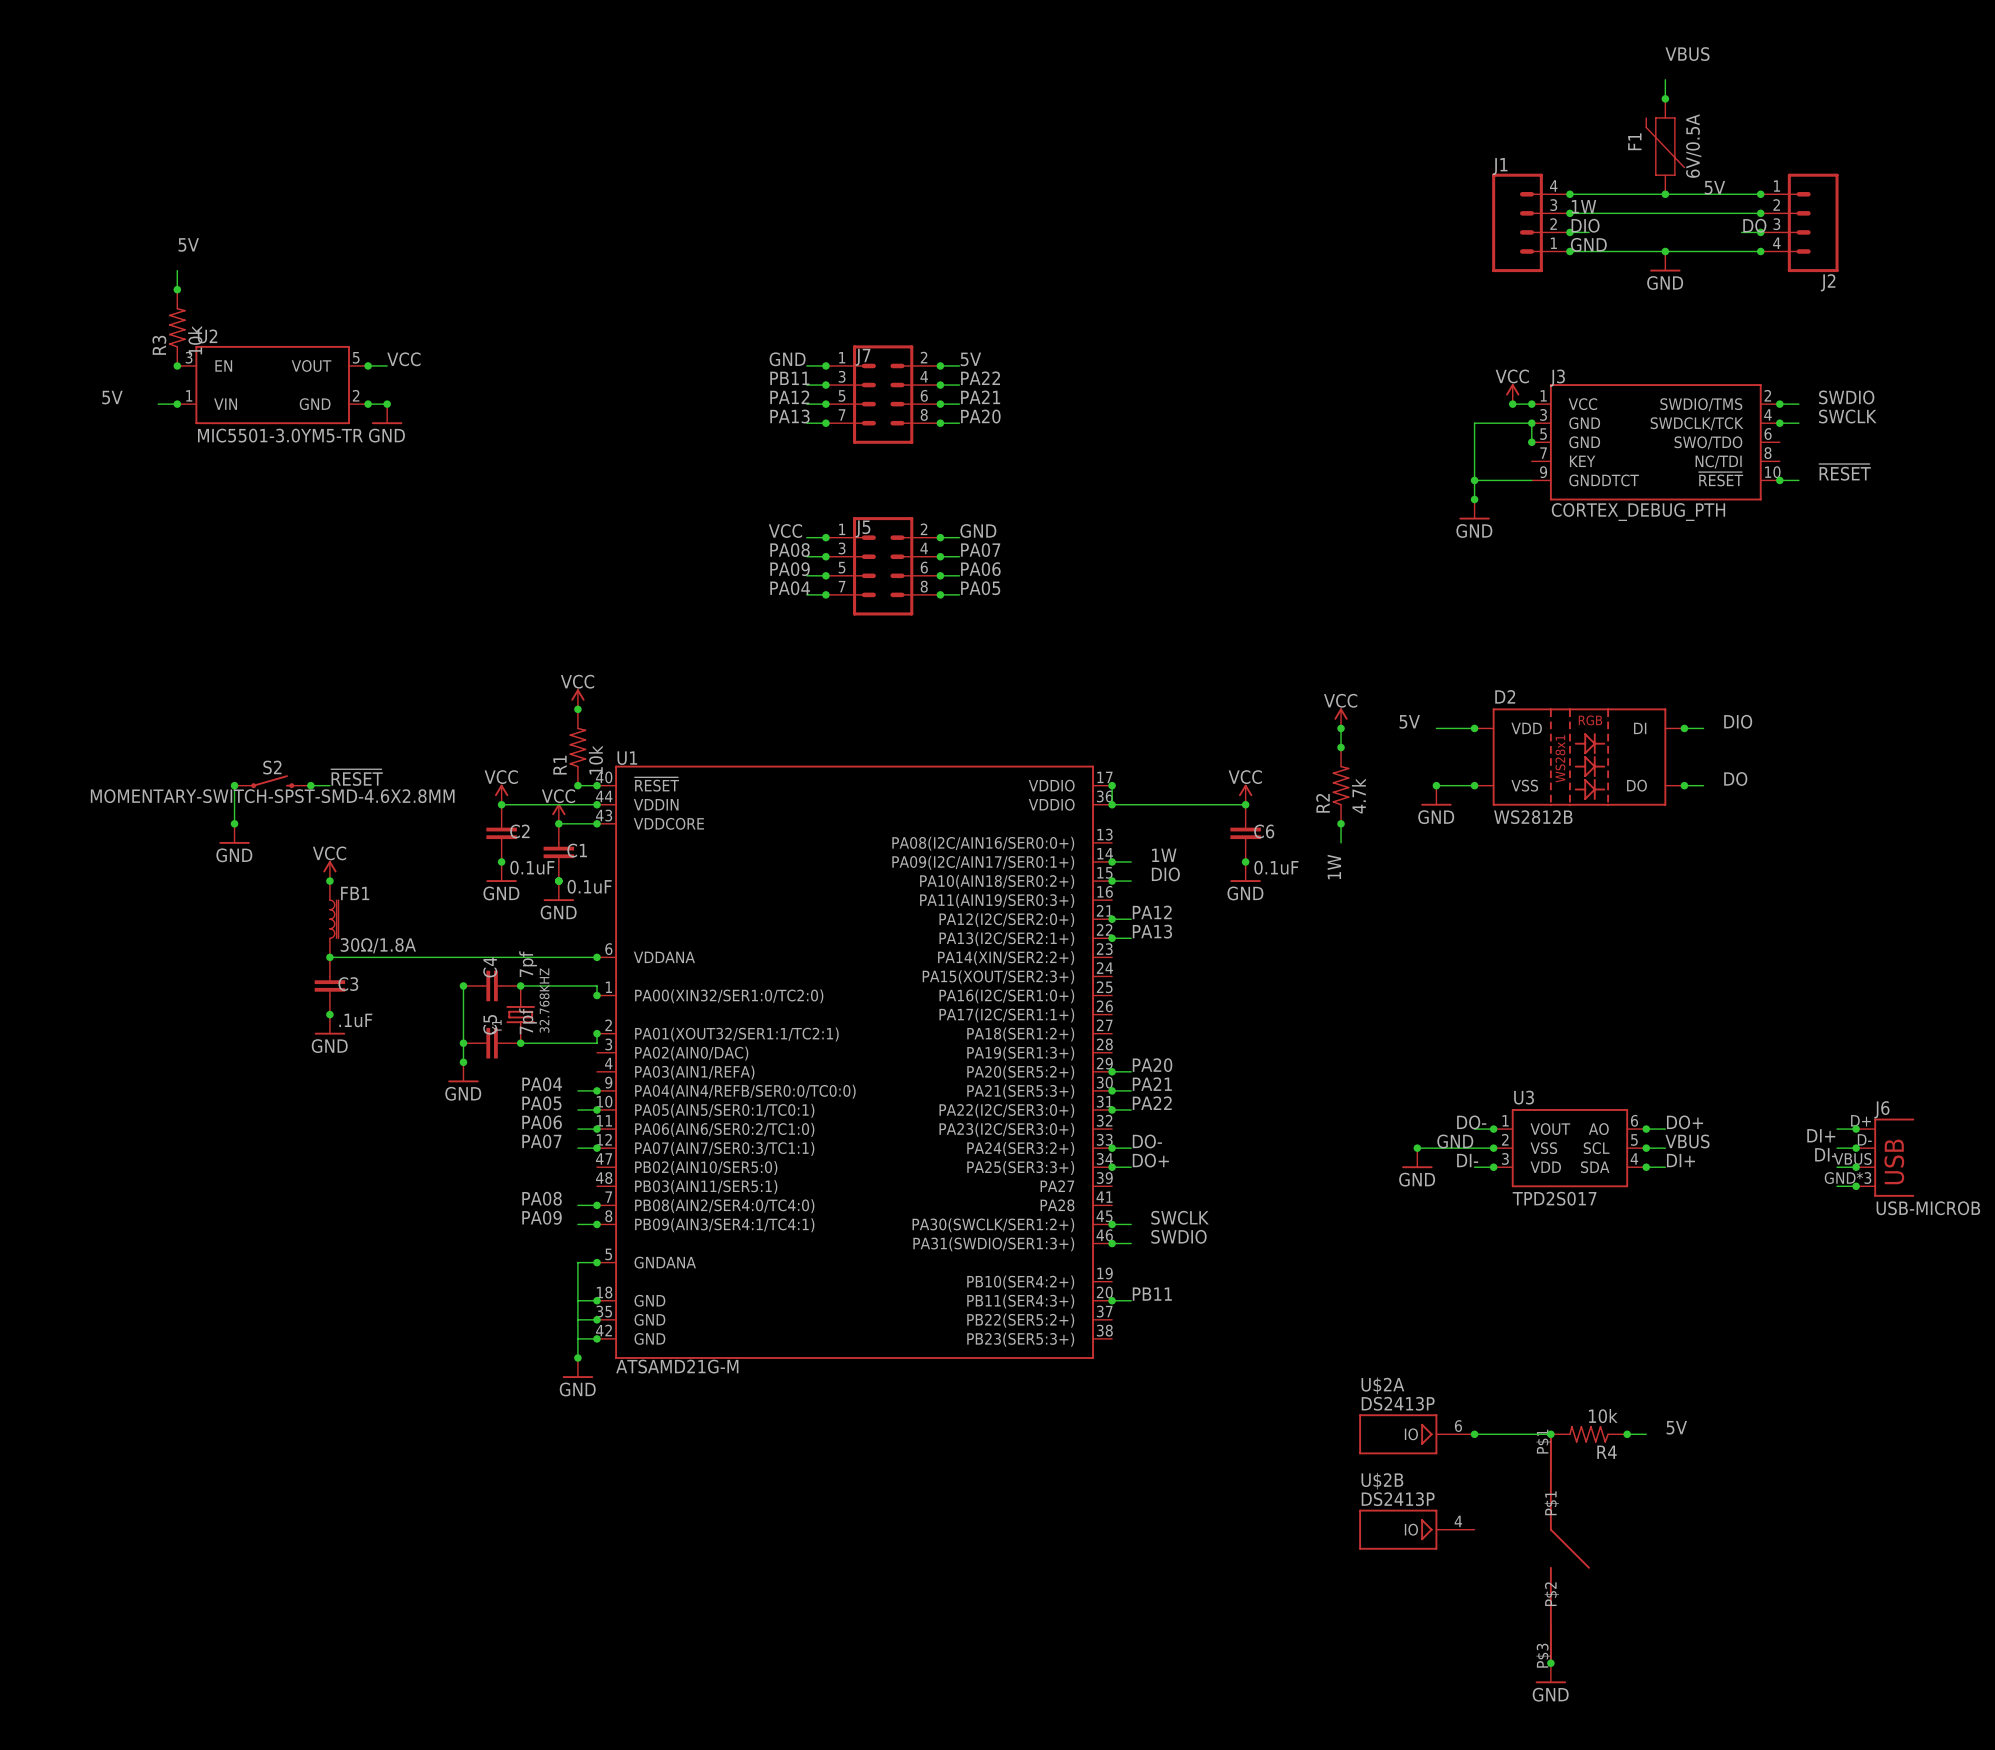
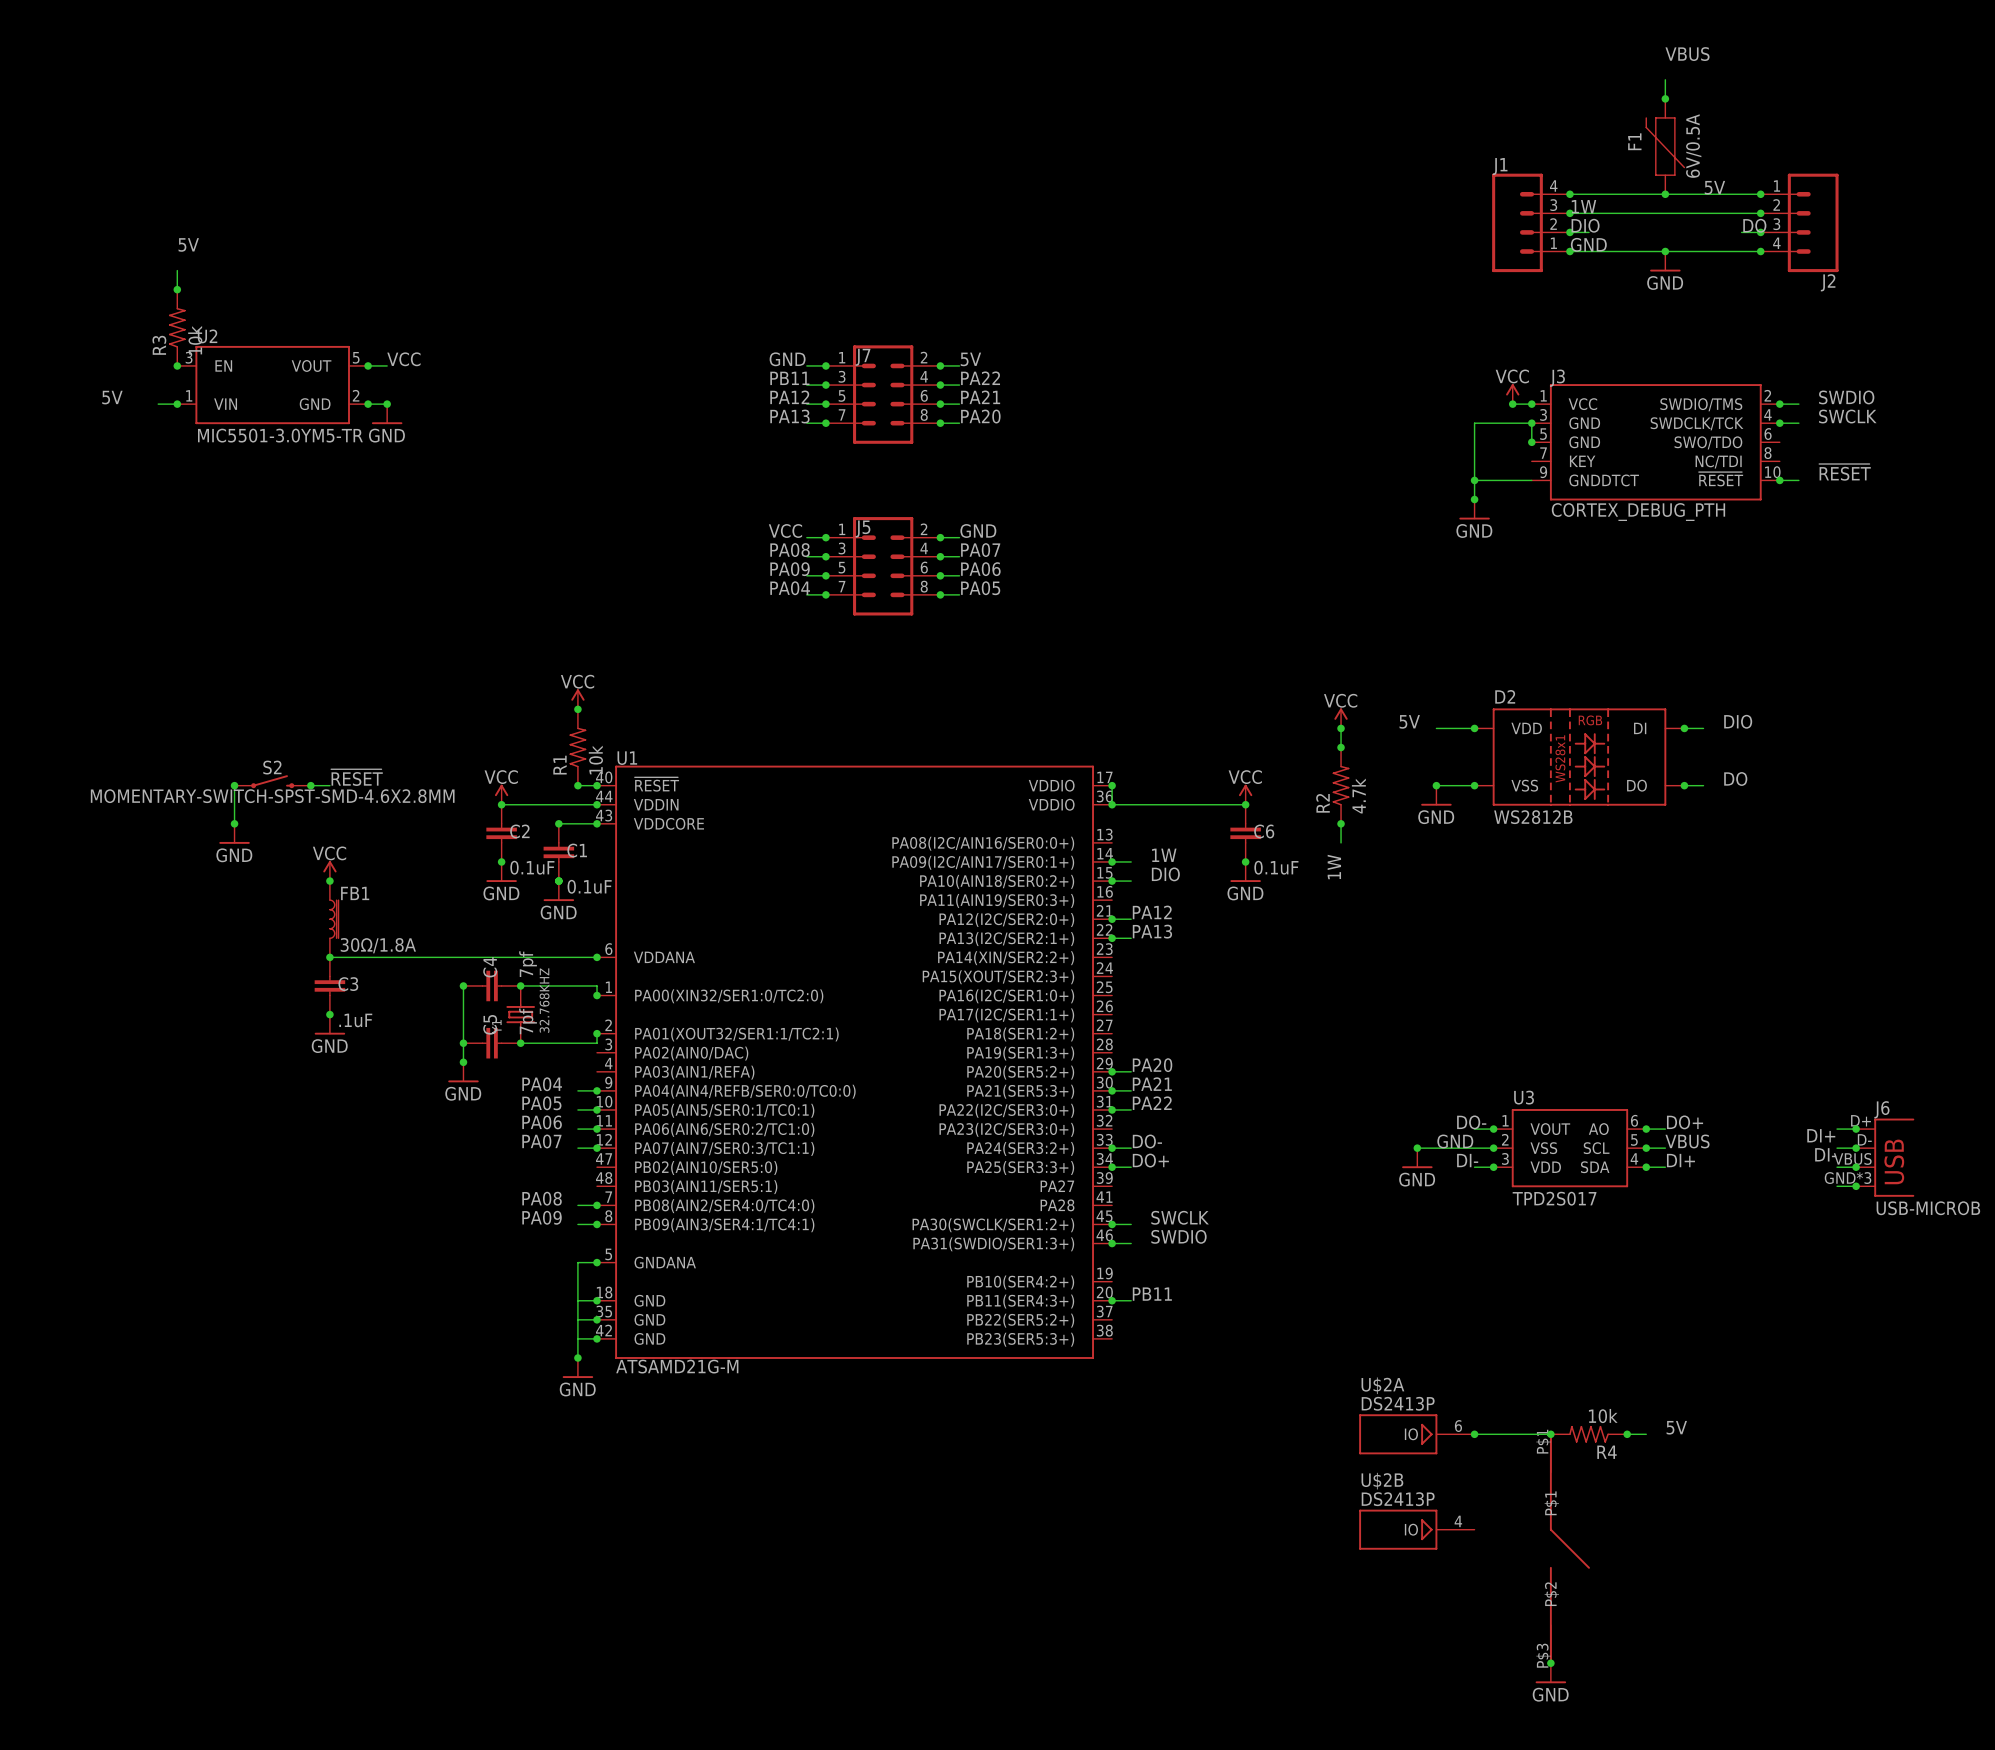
power symbol: VCC (558, 813) -> none

